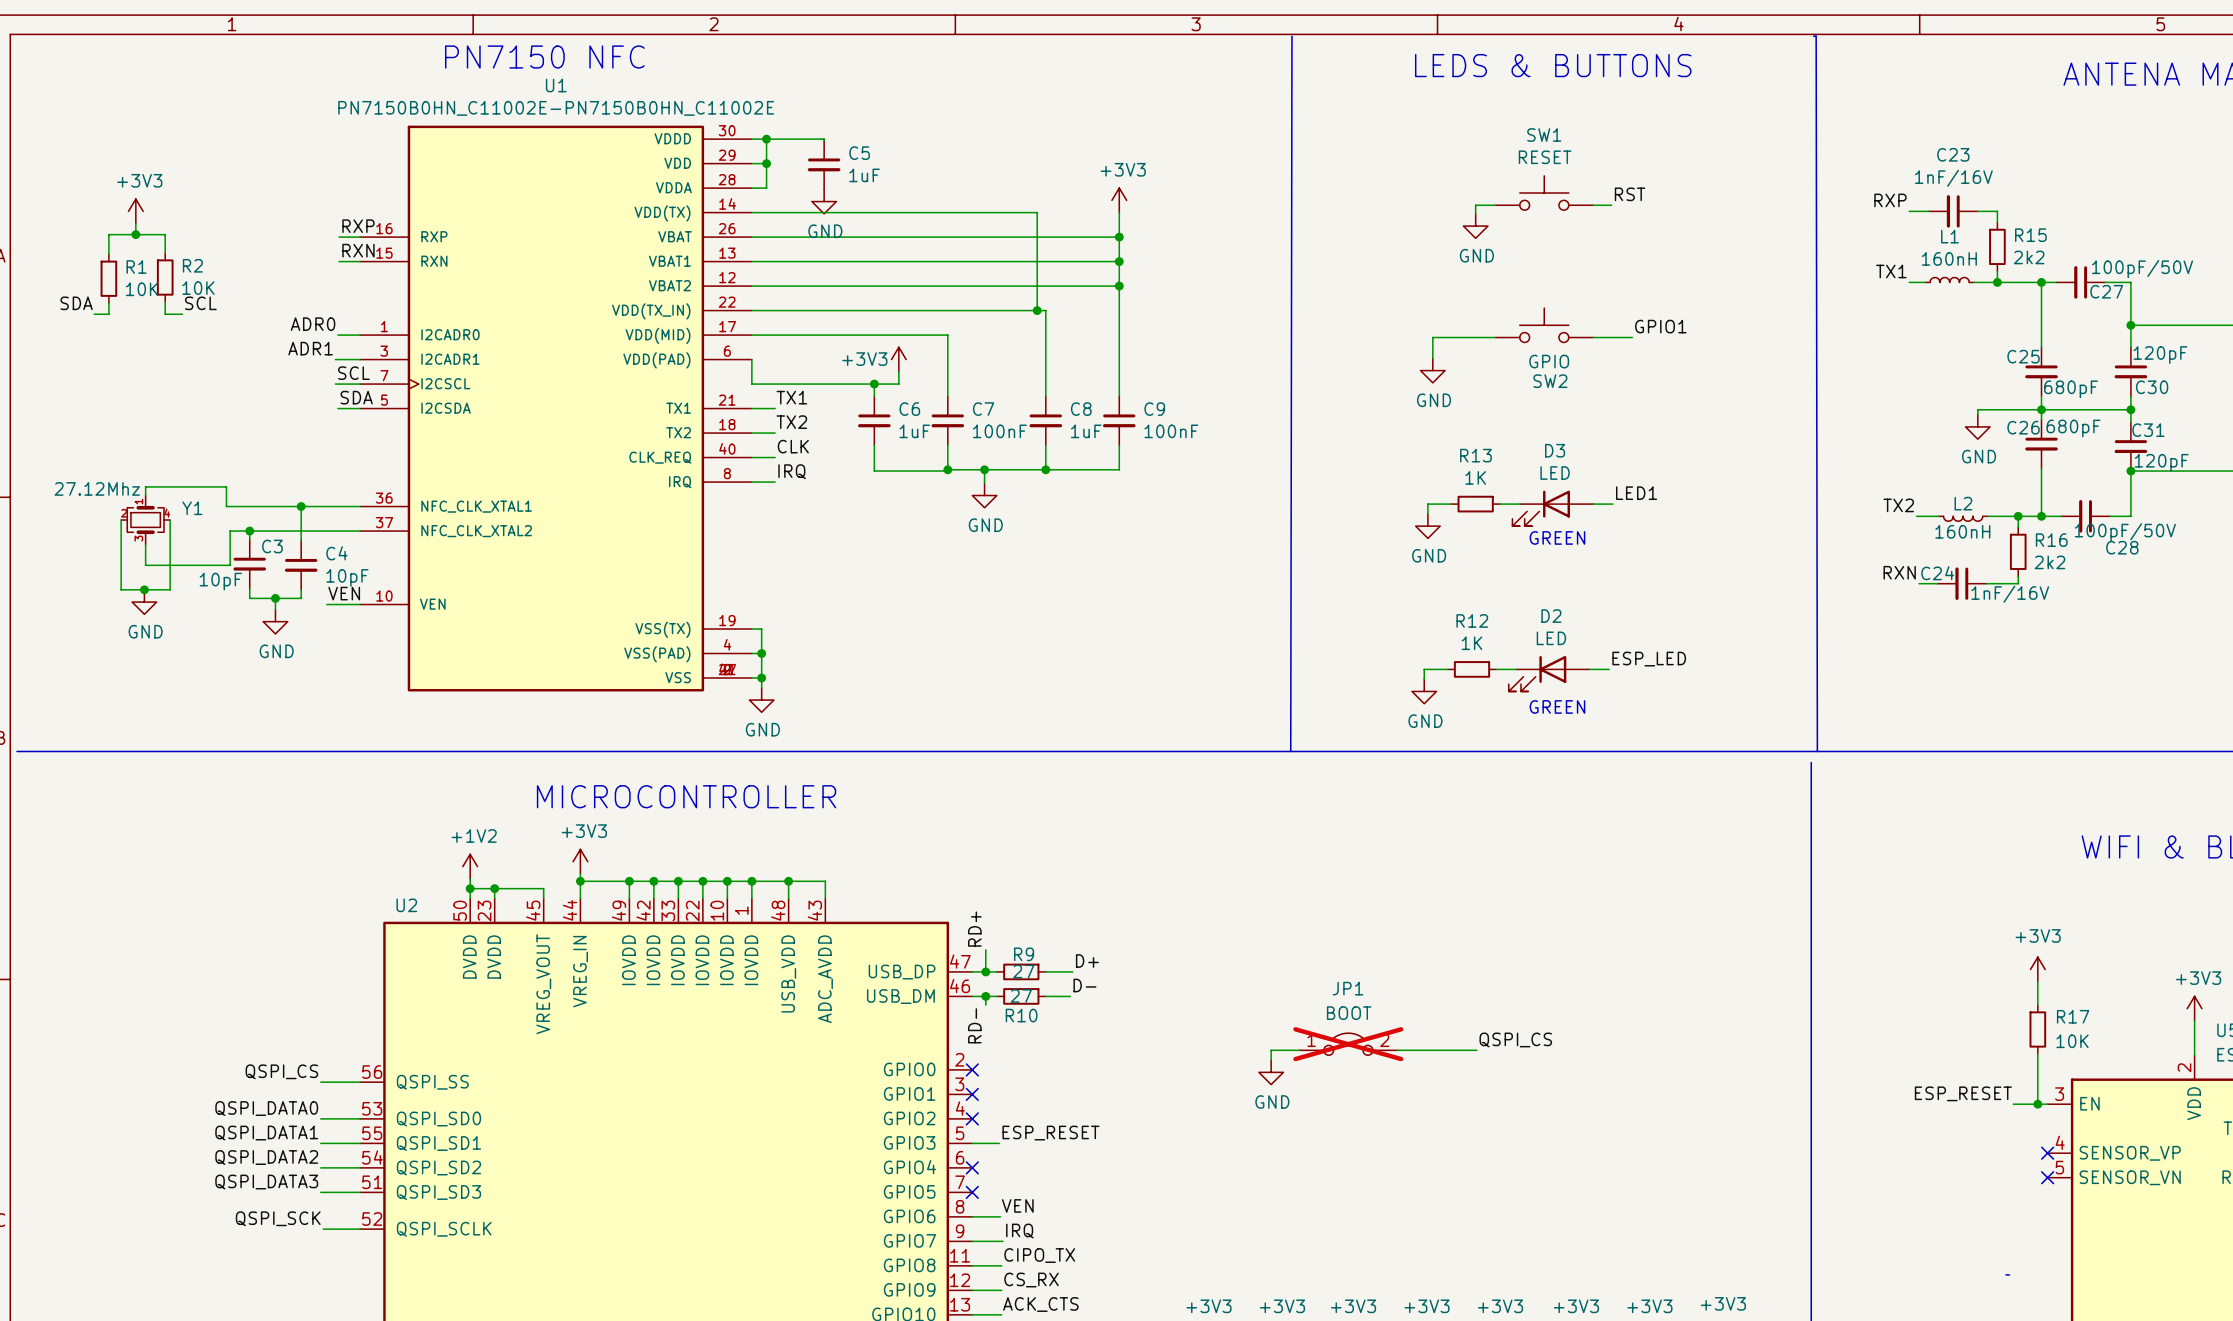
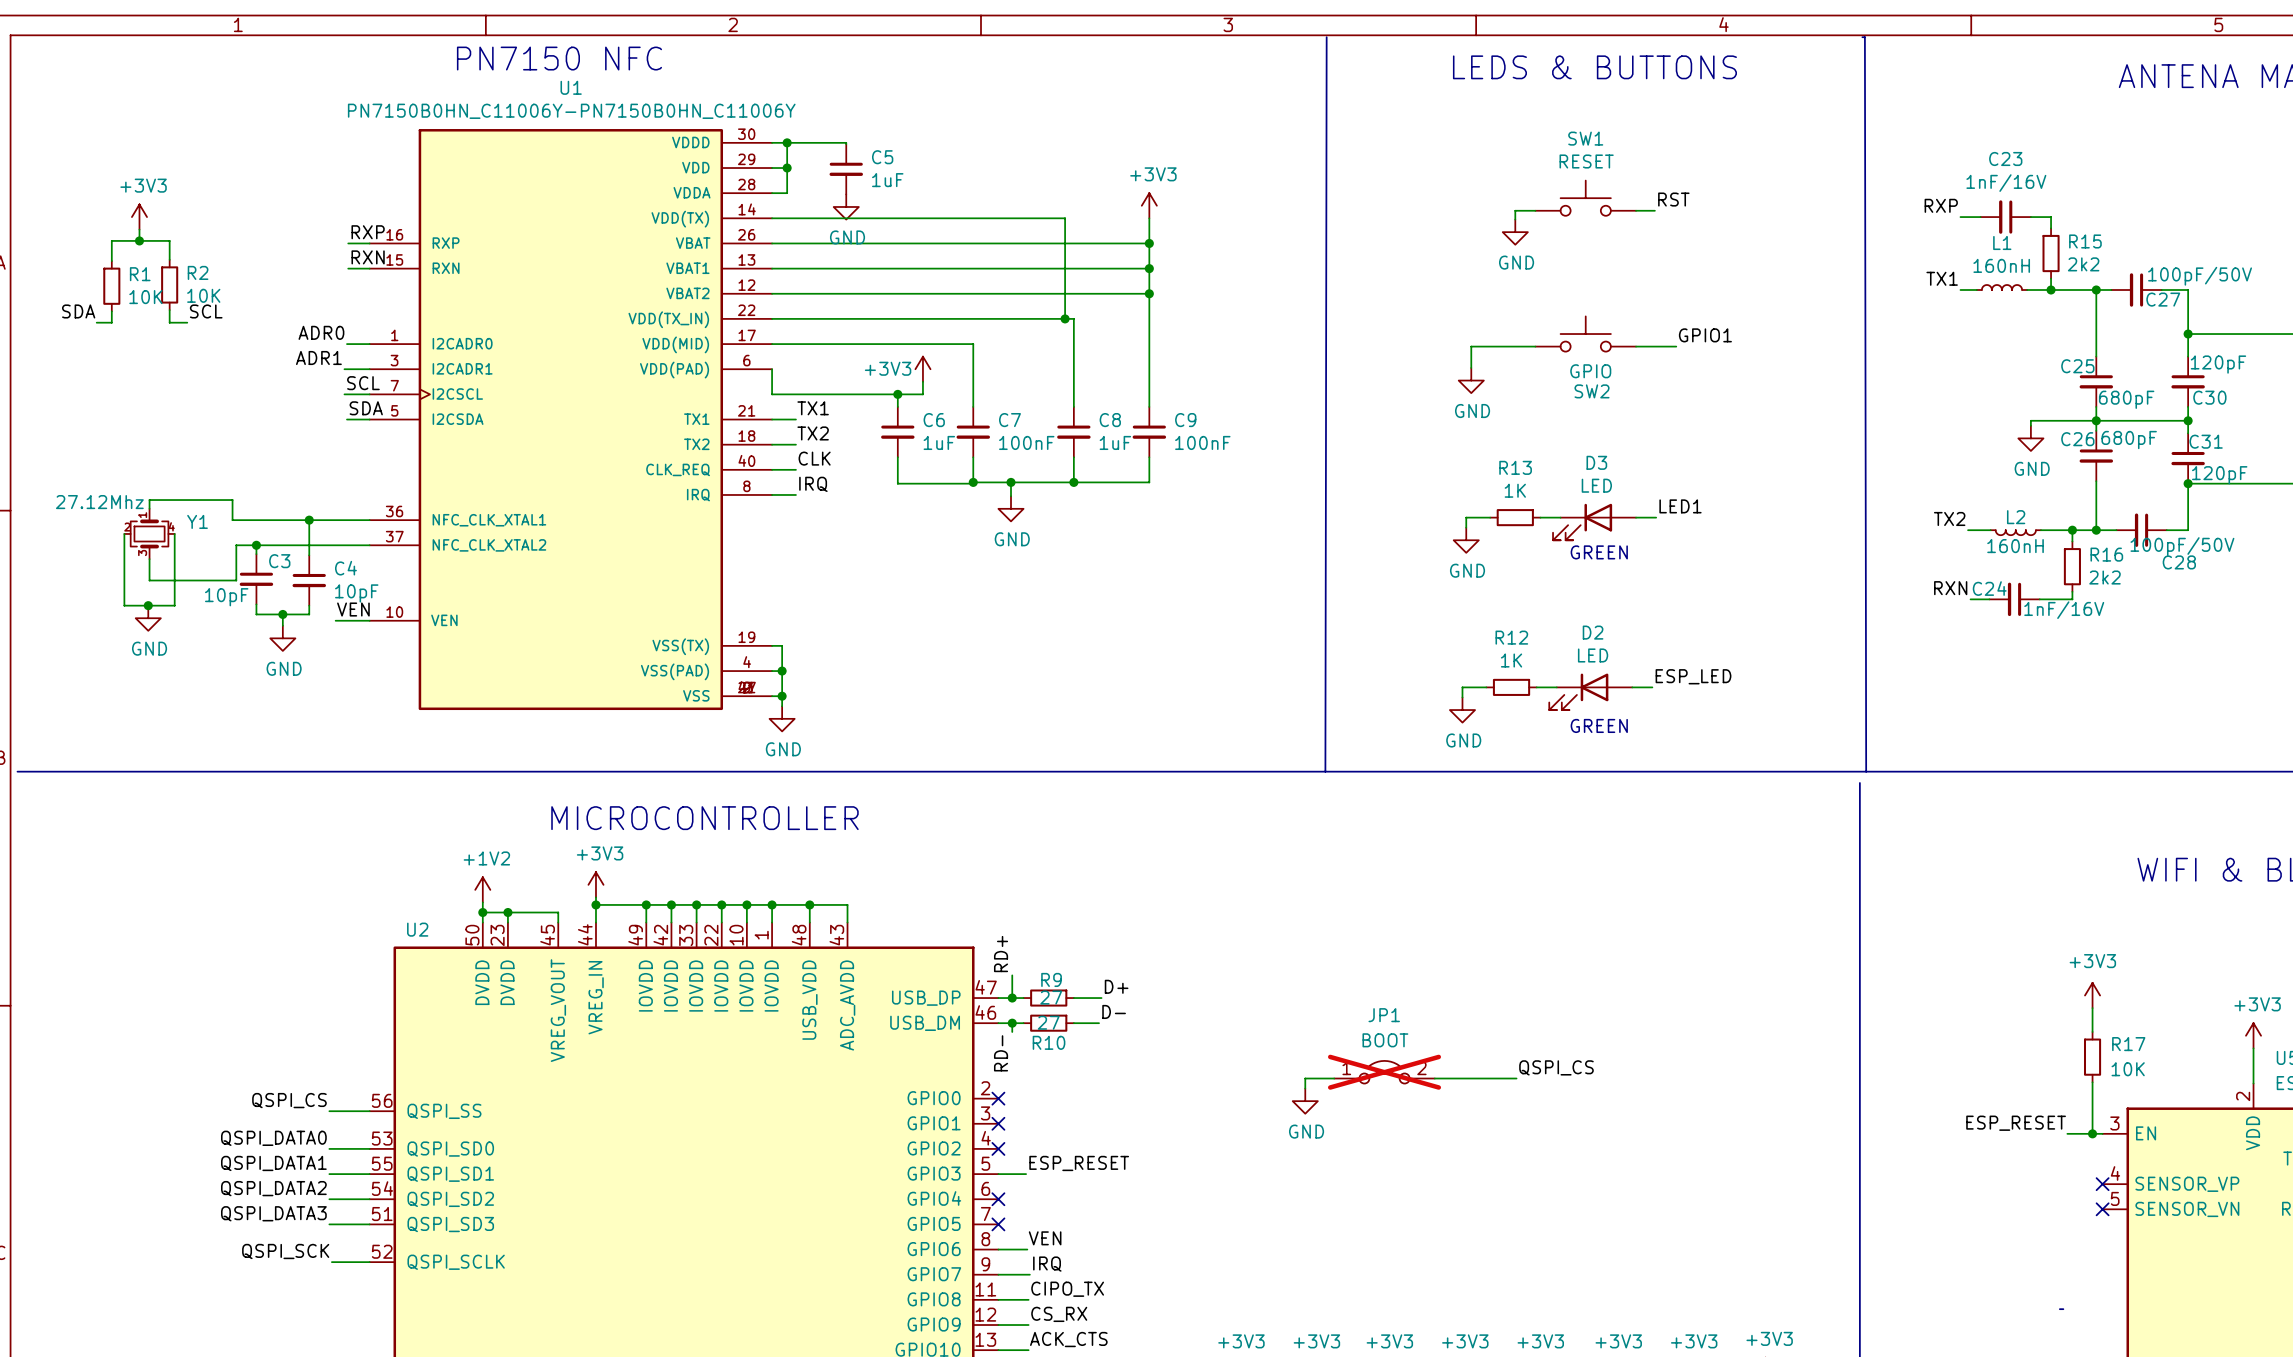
U1 value: PN7150B0HN_C11002E-PN7150B0HN_C11002E (556, 108) -> PN7150B0HN_C11006Y-PN7150B0HN_C11006Y (571, 111)

